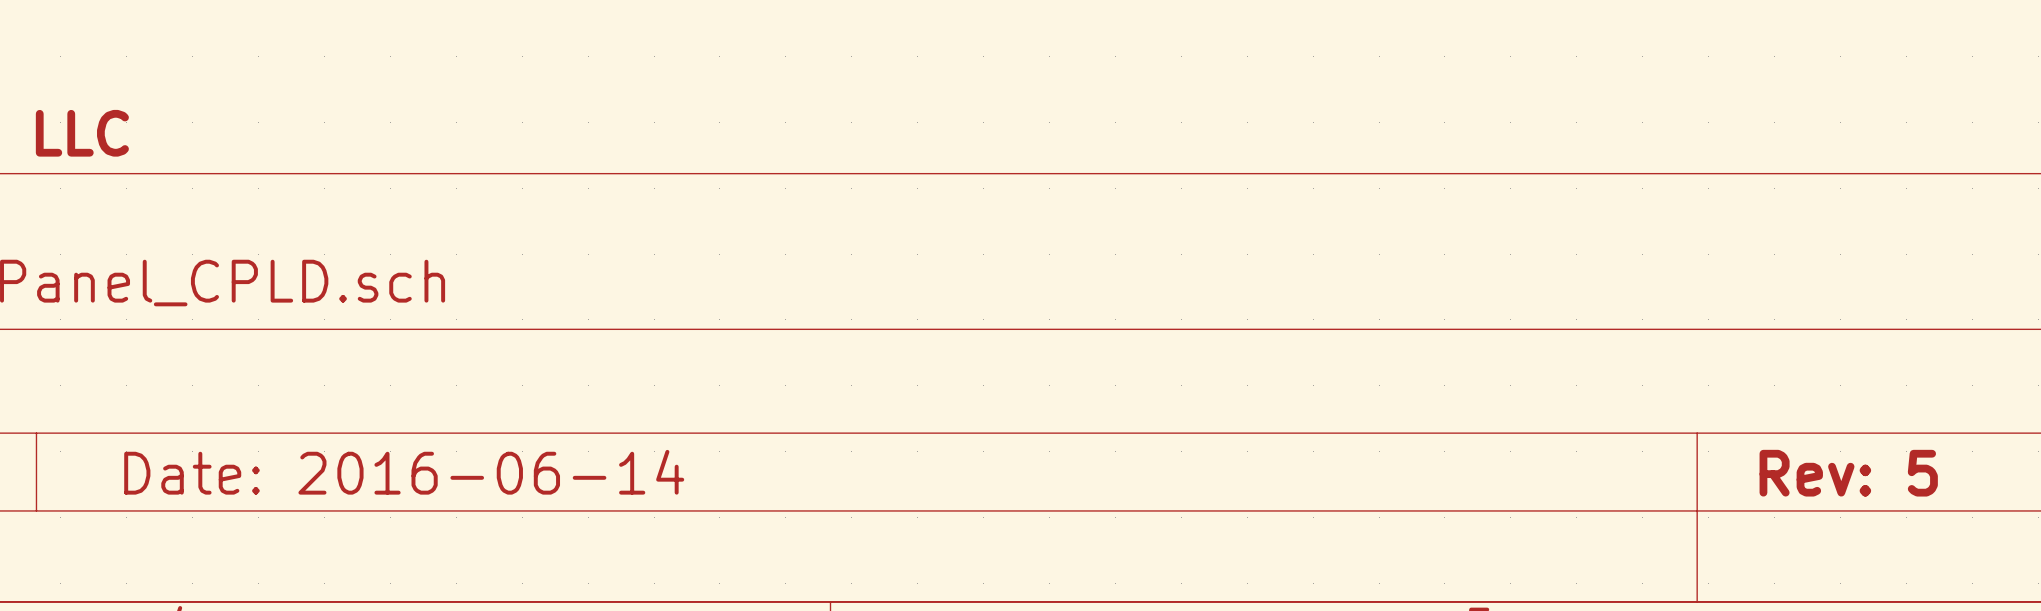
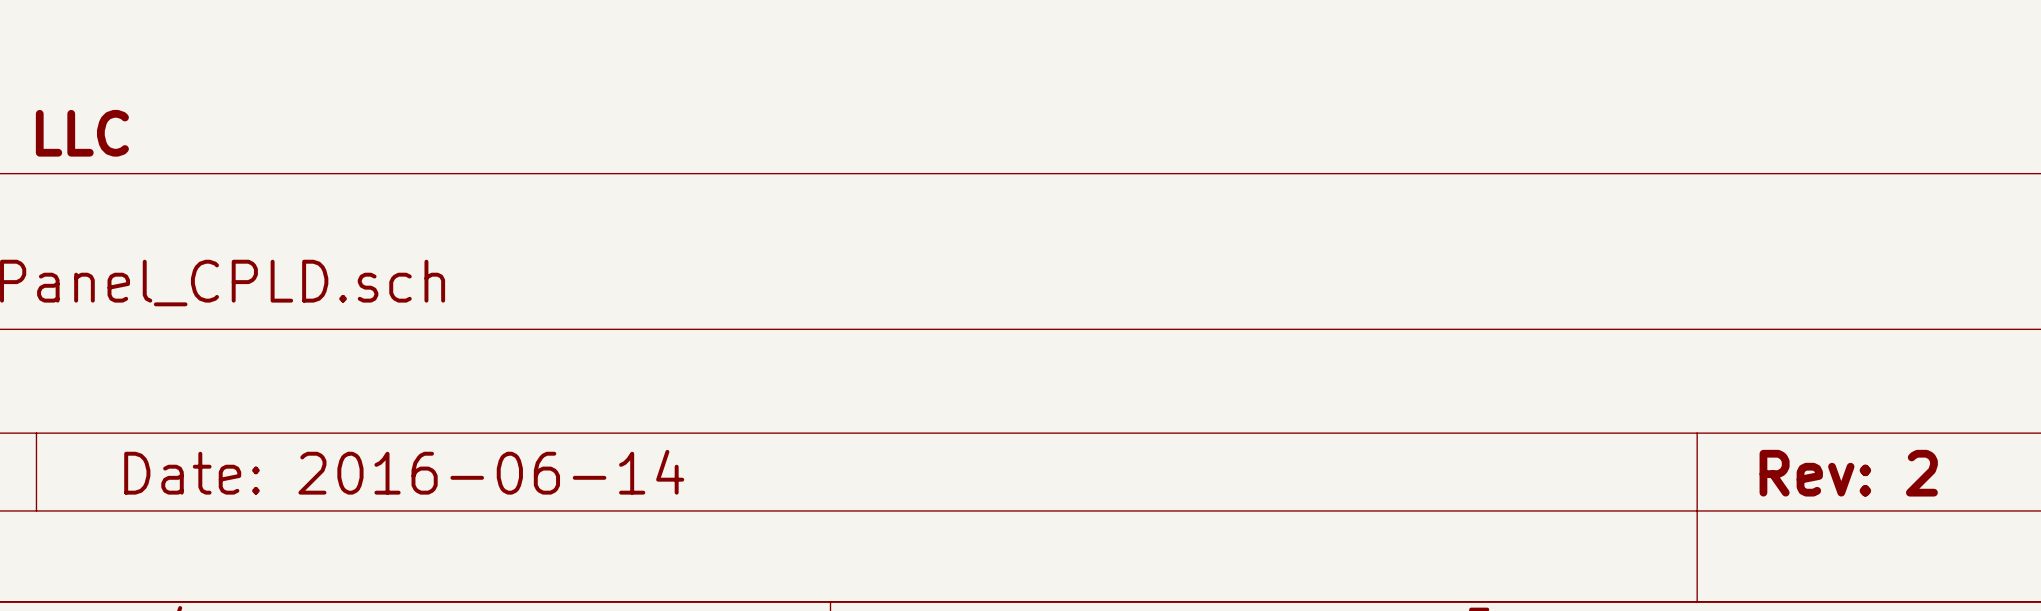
title block: Rev: 5 (1848, 473) -> Rev: 2 (1848, 473)

